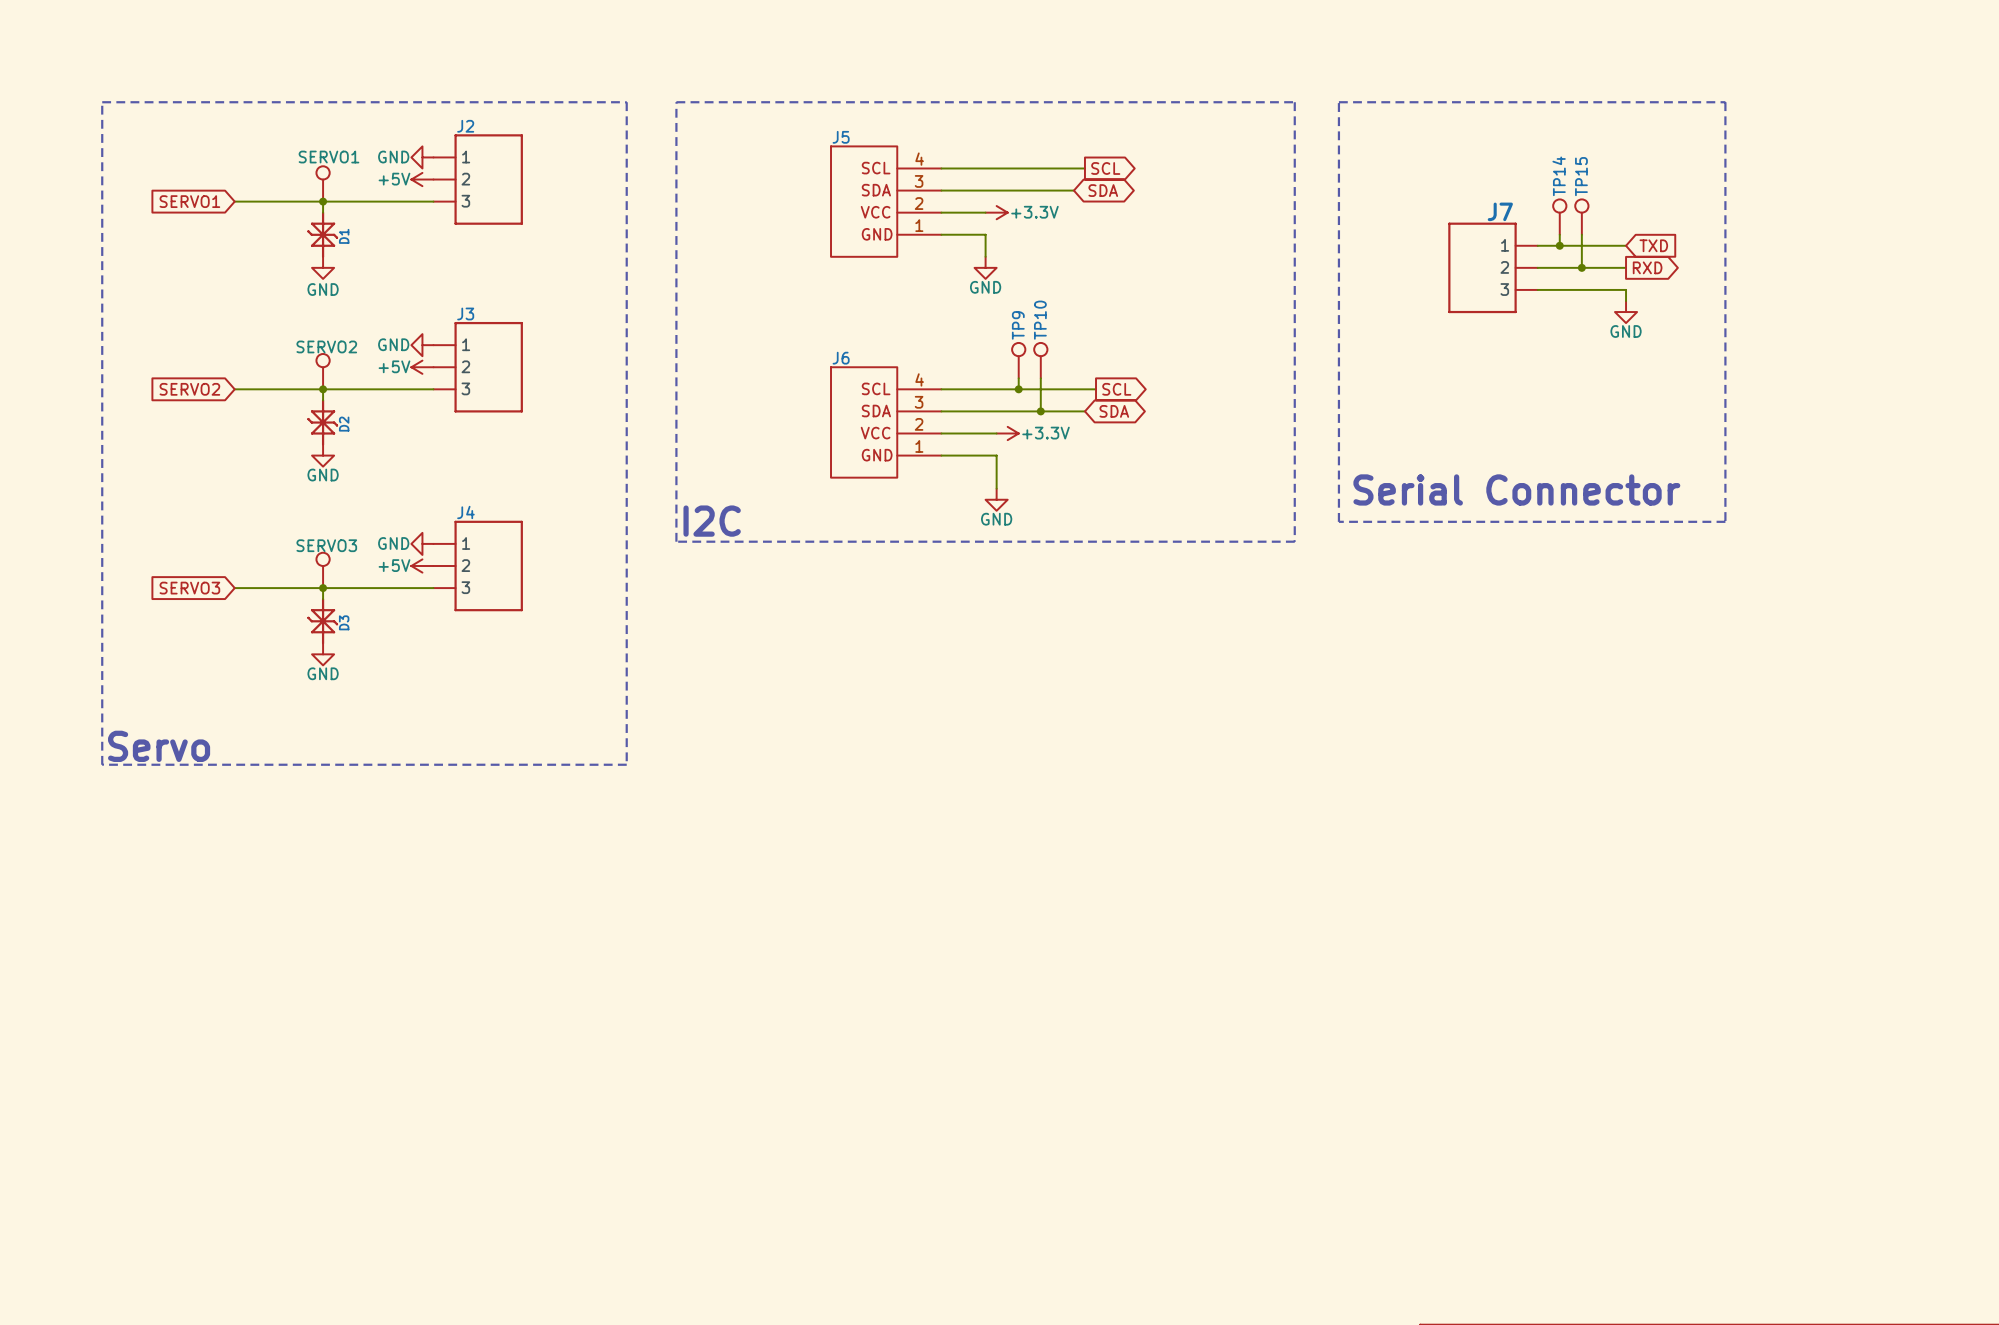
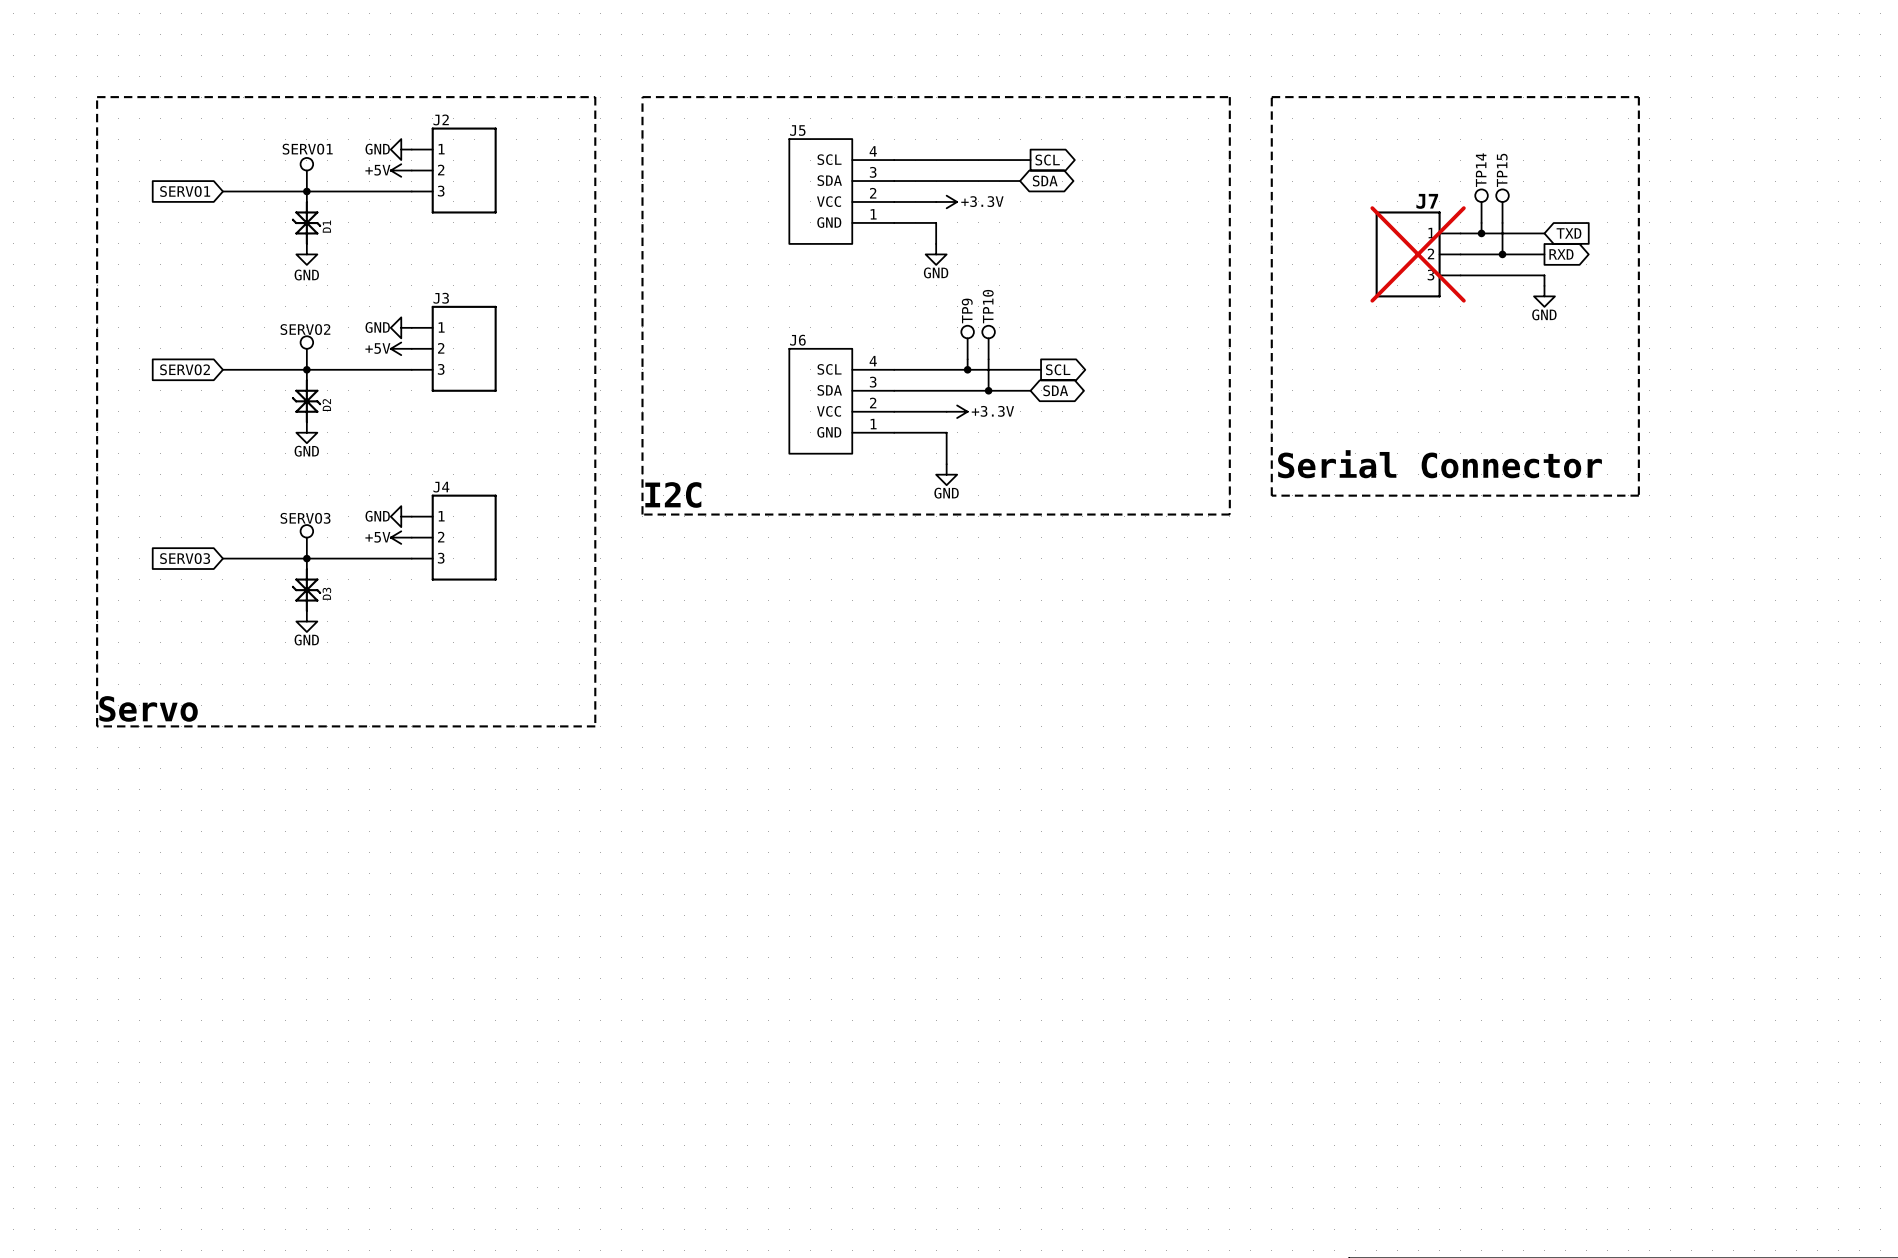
J7 do-not-place cross: none -> (1418, 254)

